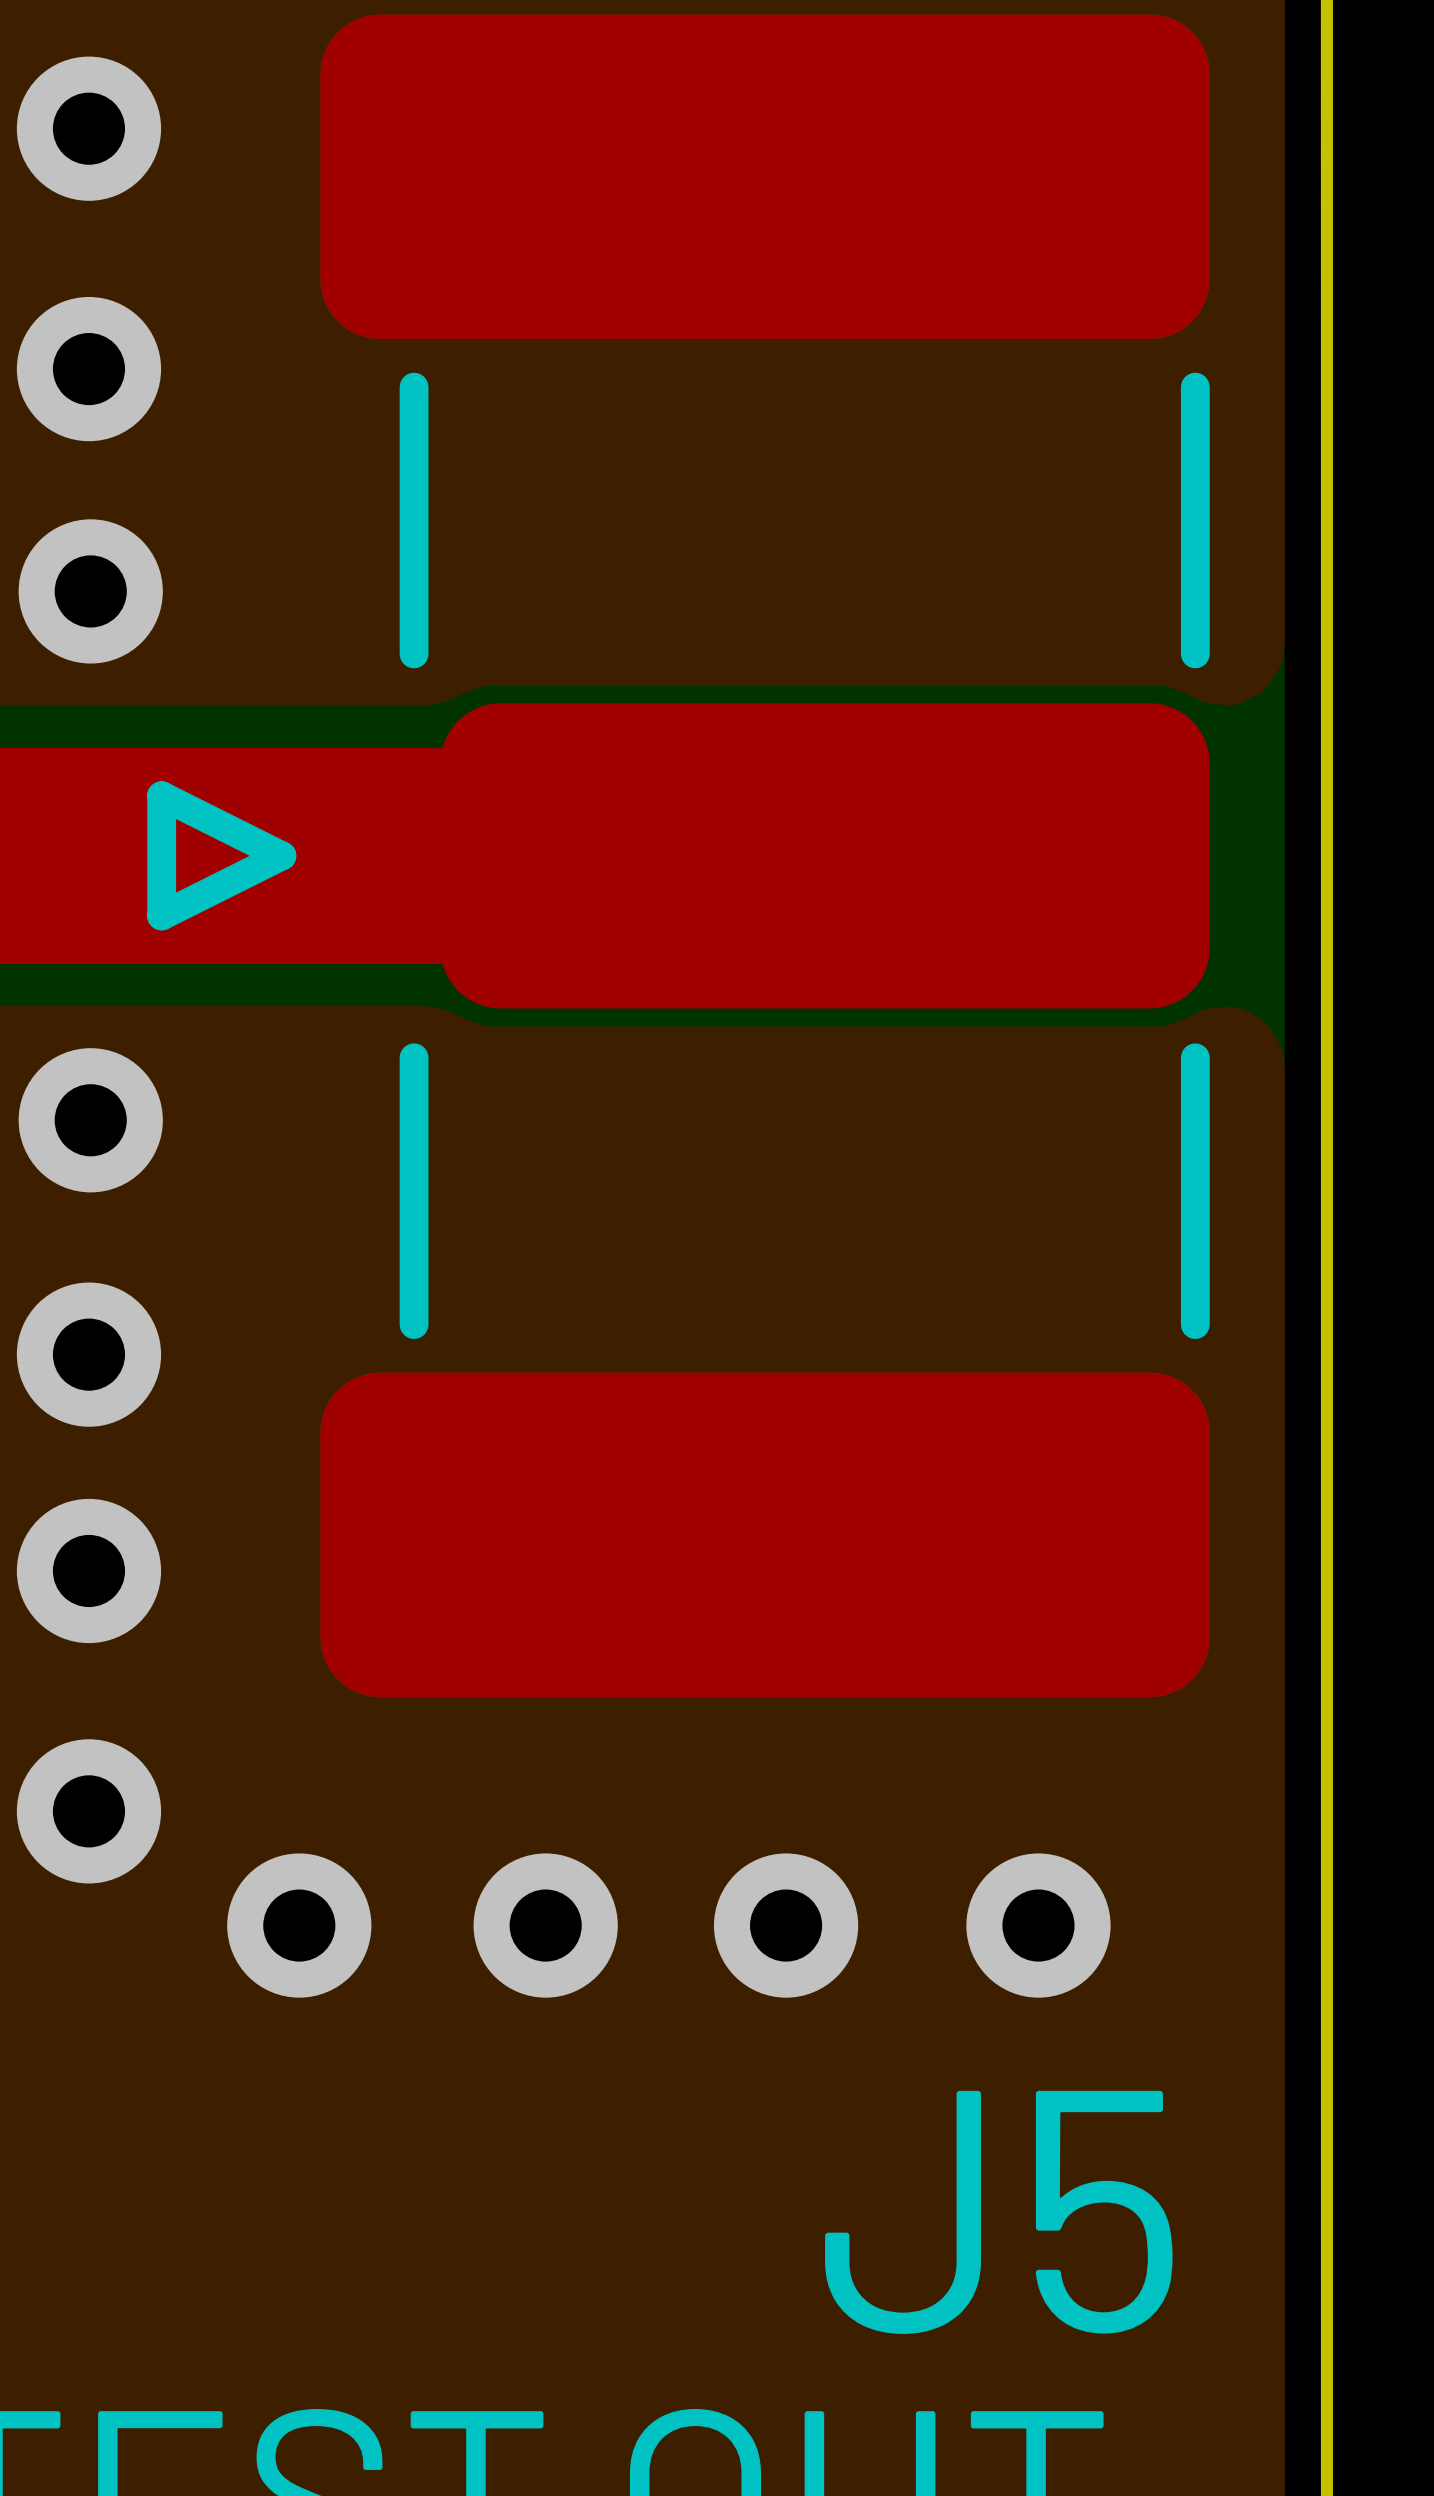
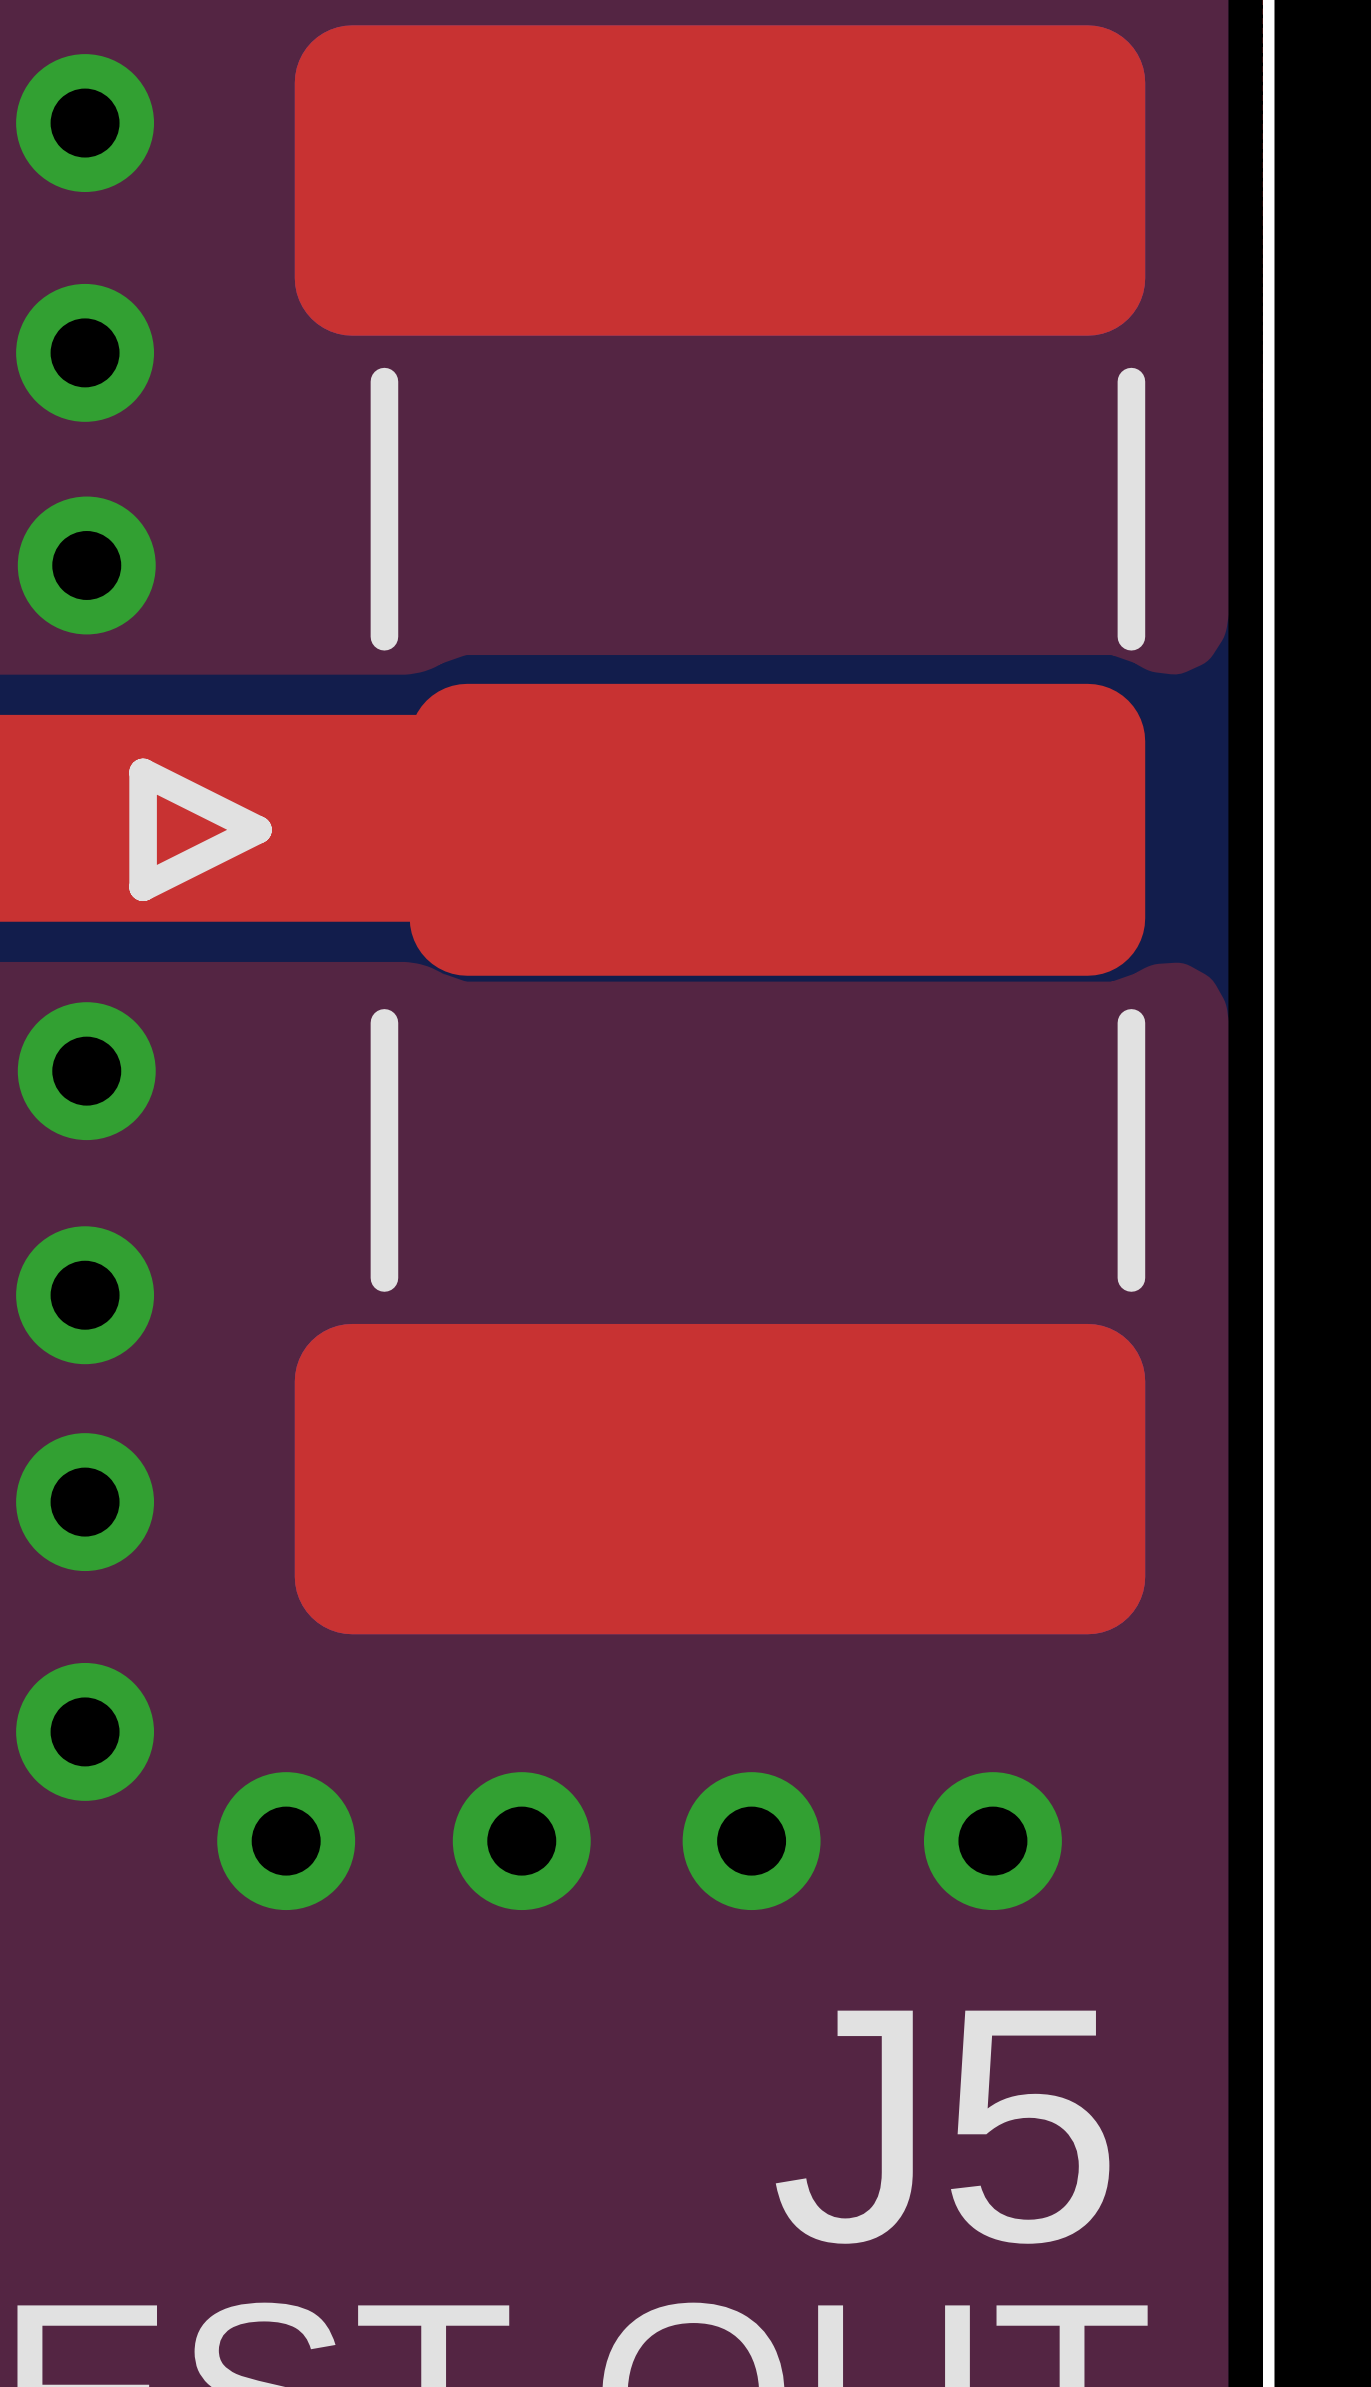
J5 position: (678, 855) -> (637, 829)

